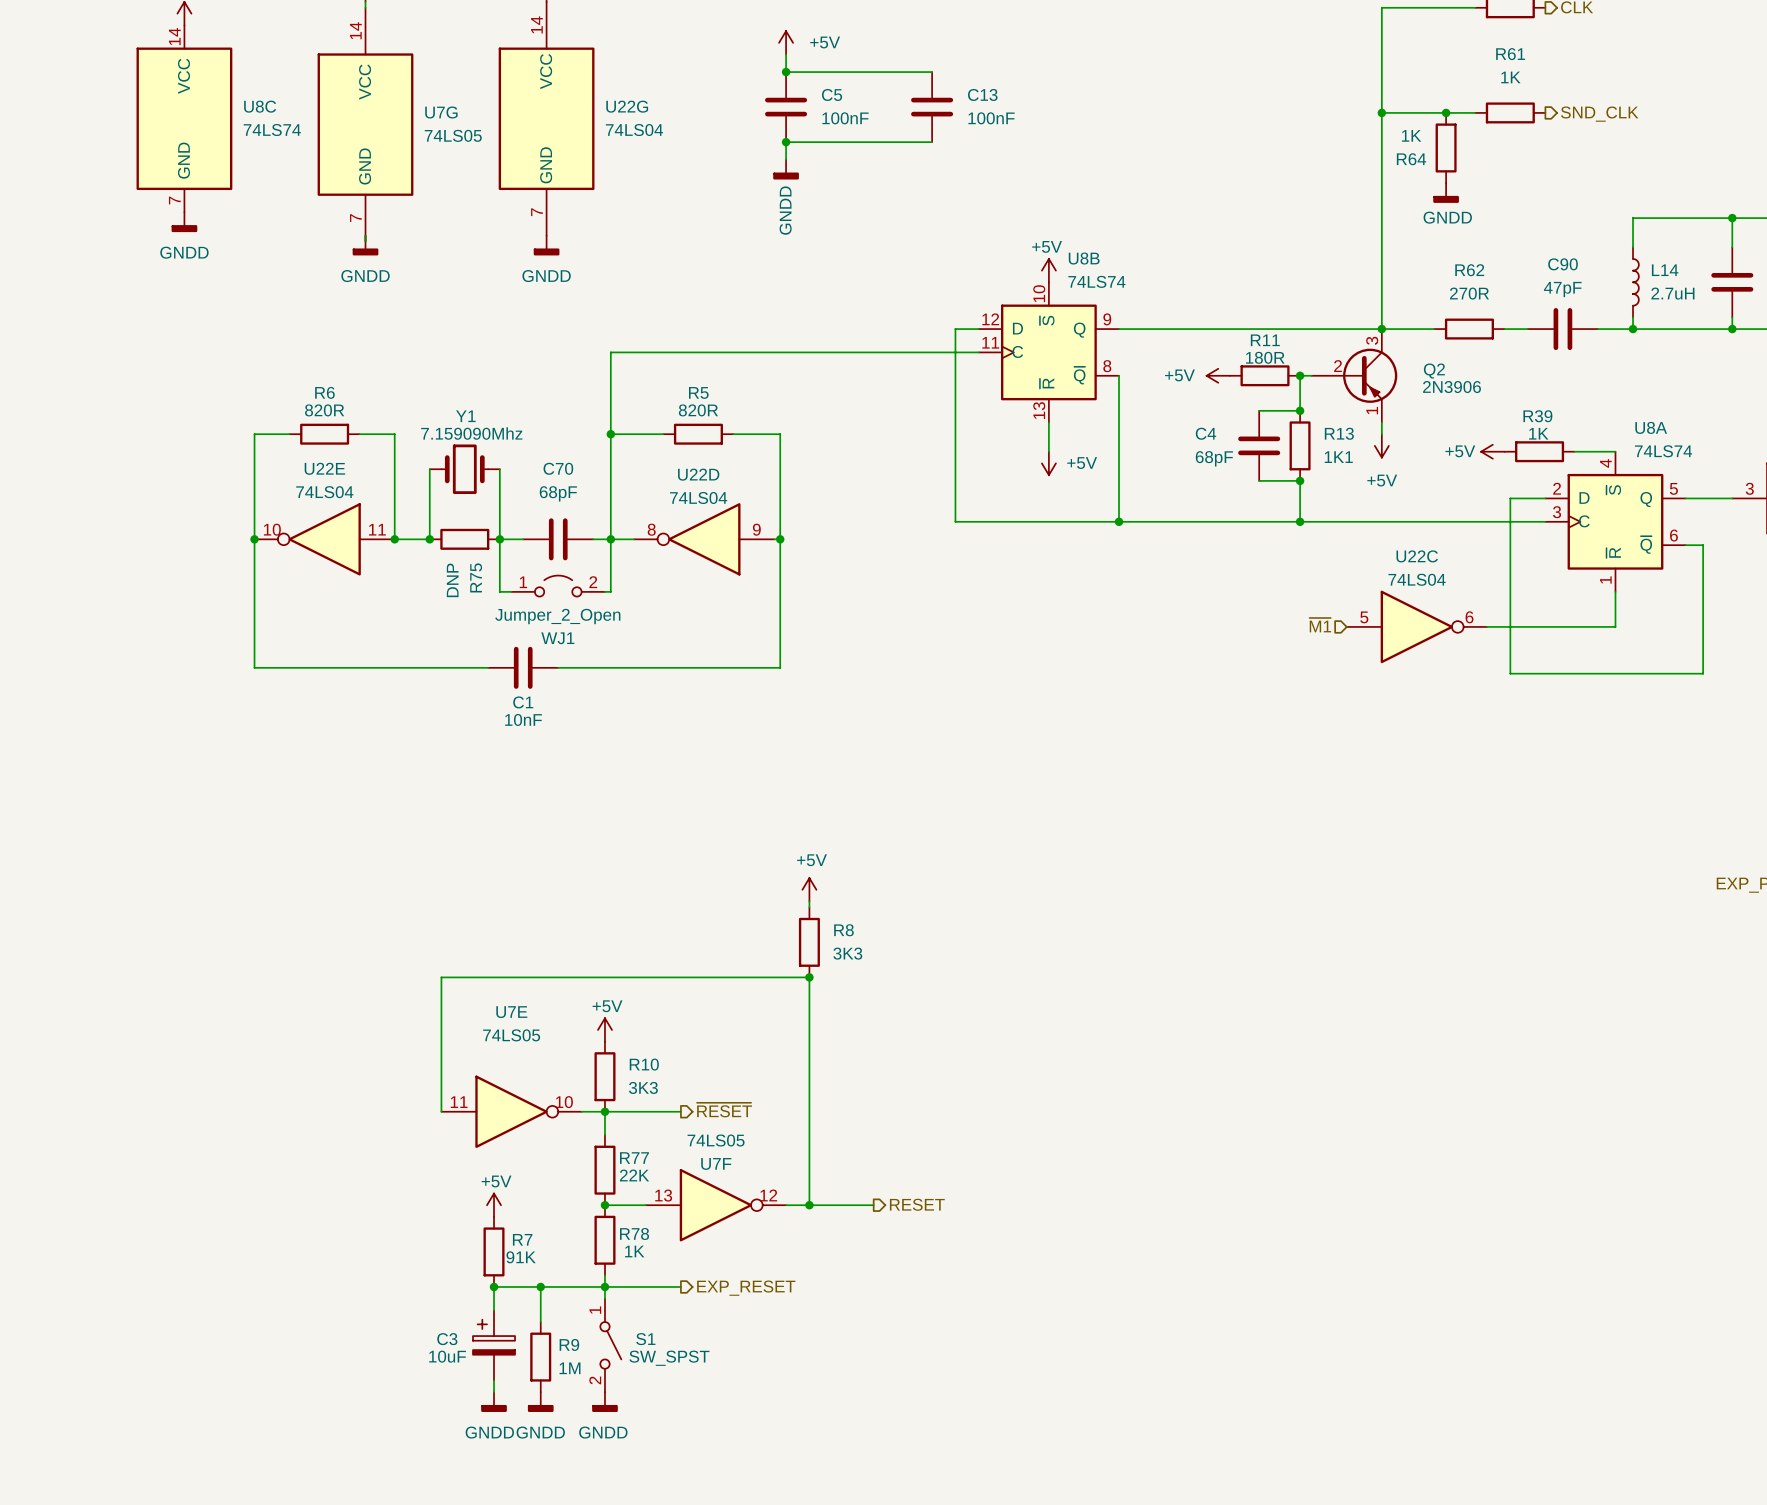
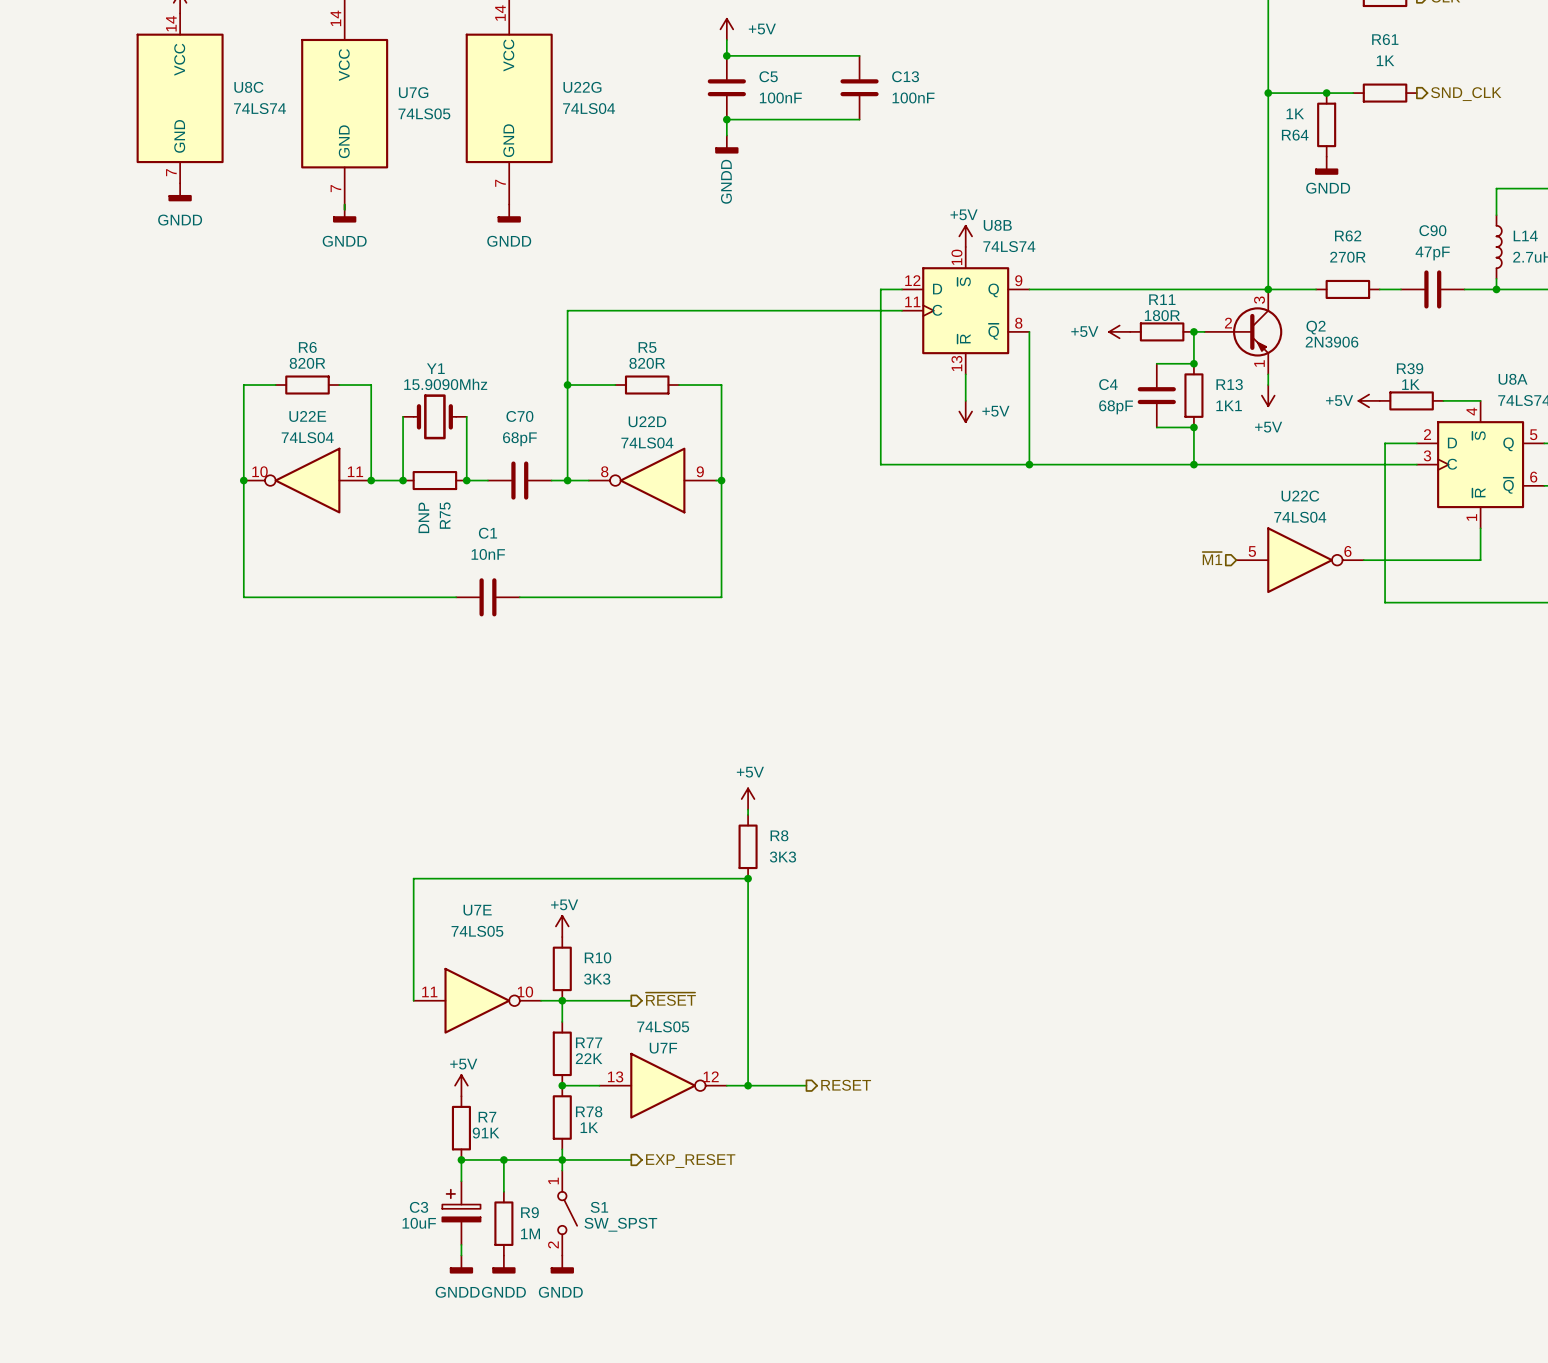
Y1 value: 7.159090Mhz (471, 433) -> 15.9090Mhz (445, 384)
wire: (499, 539) (499, 591) (511, 591) -> none
wire: (610, 539) (610, 591) (604, 591) -> none
WJ1: Jumper_2_Open (558, 586) -> none
C1 name position: C1 (523, 702) -> C1 (487, 533)
C1 value position: 10nF (523, 719) -> 10nF (488, 554)

